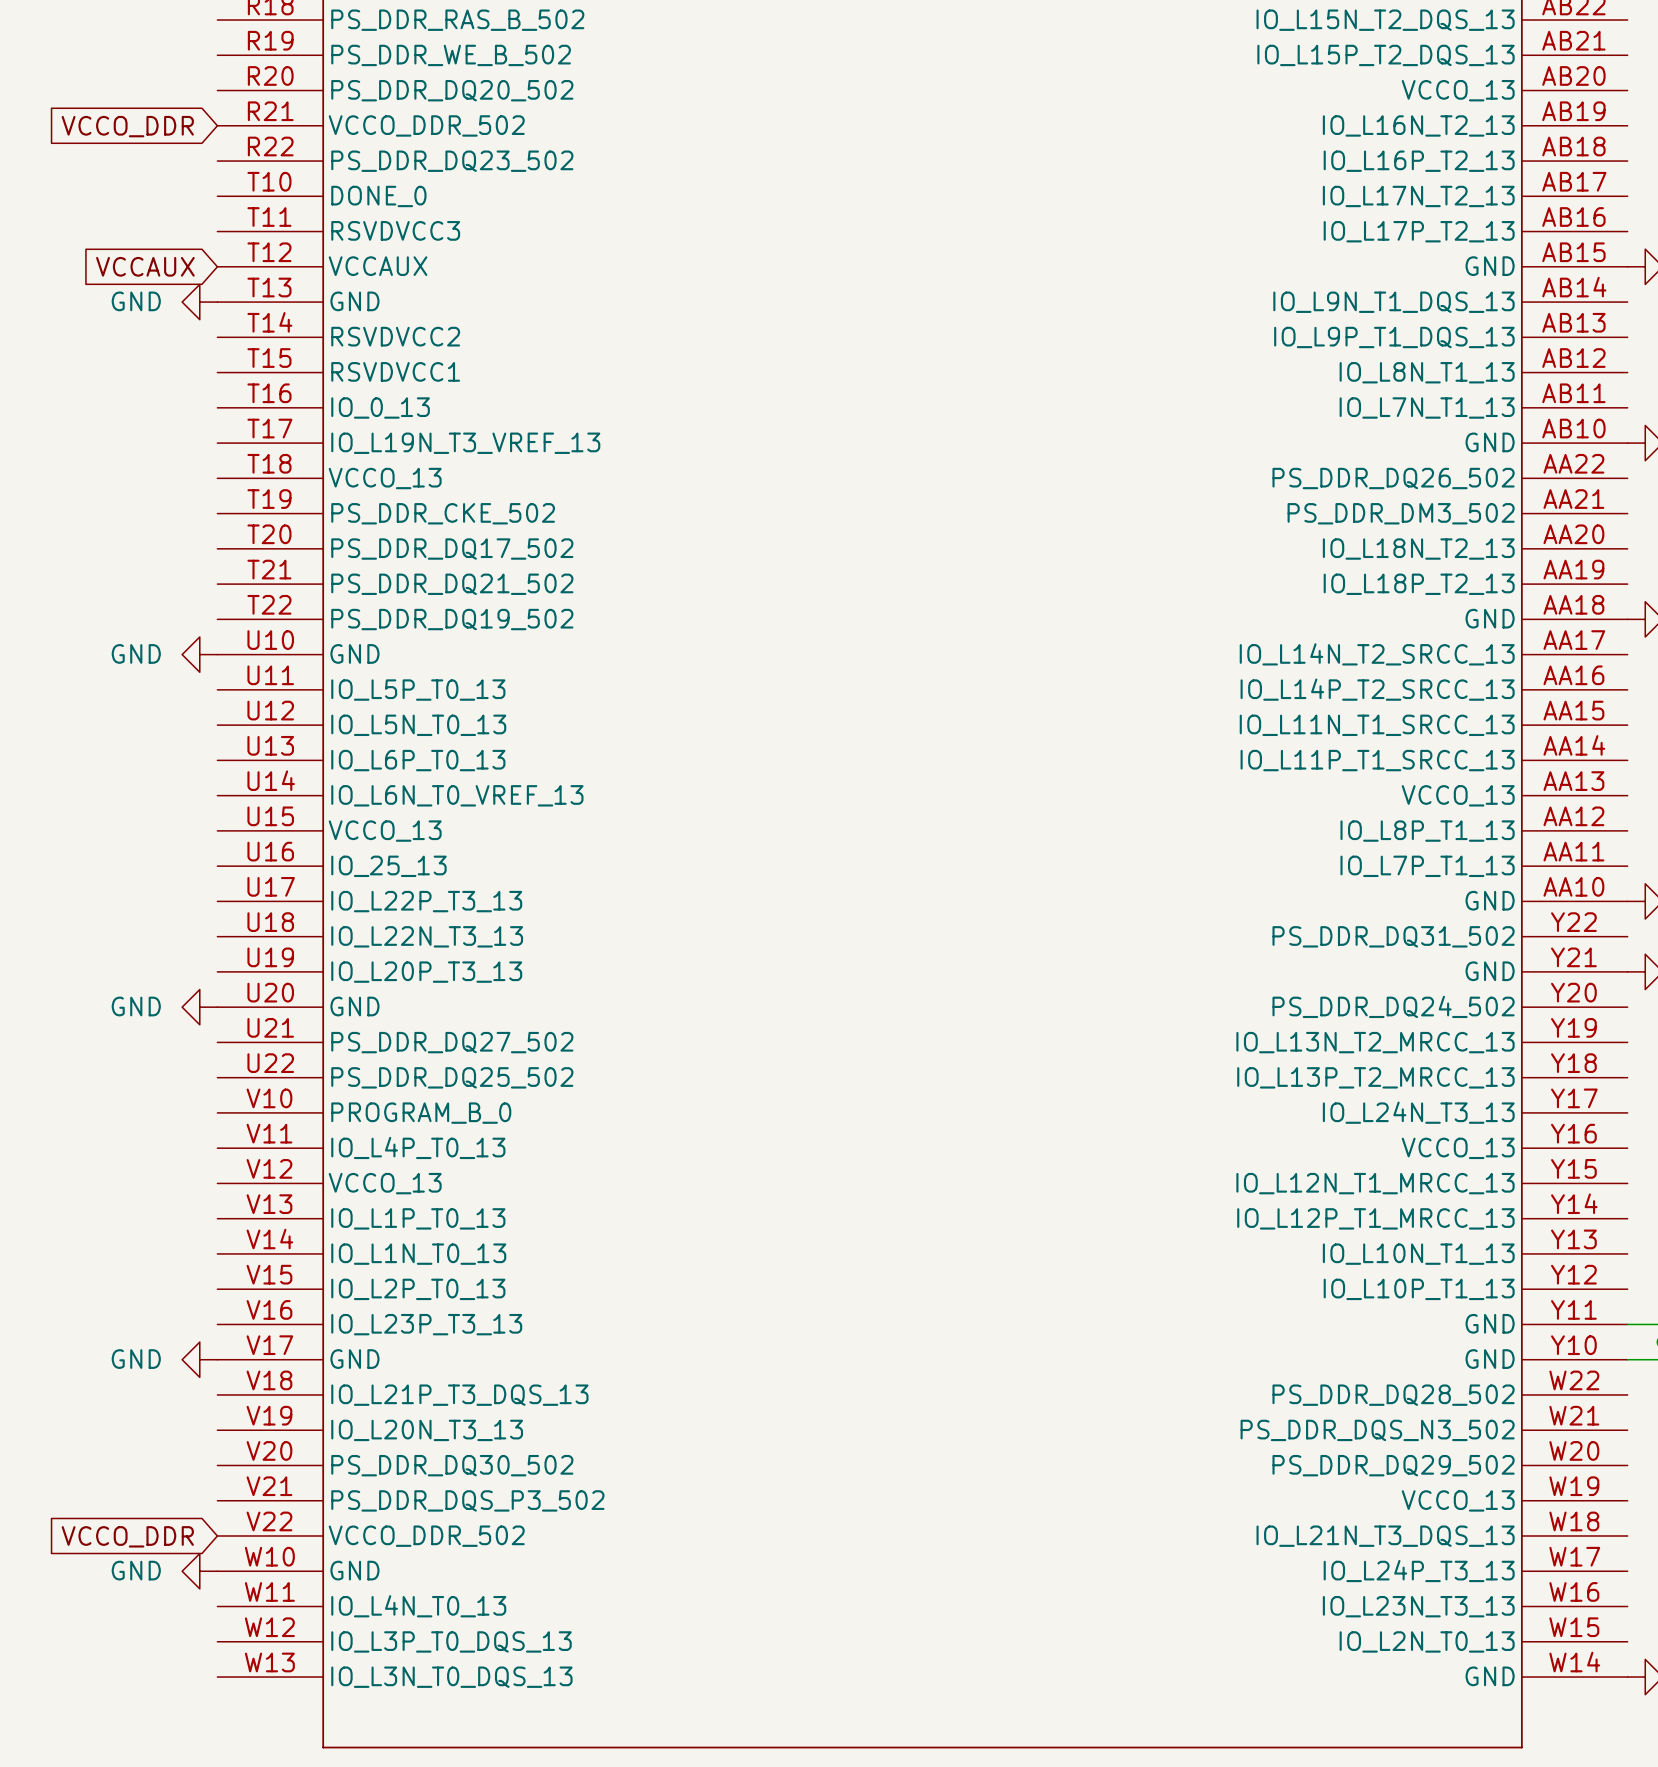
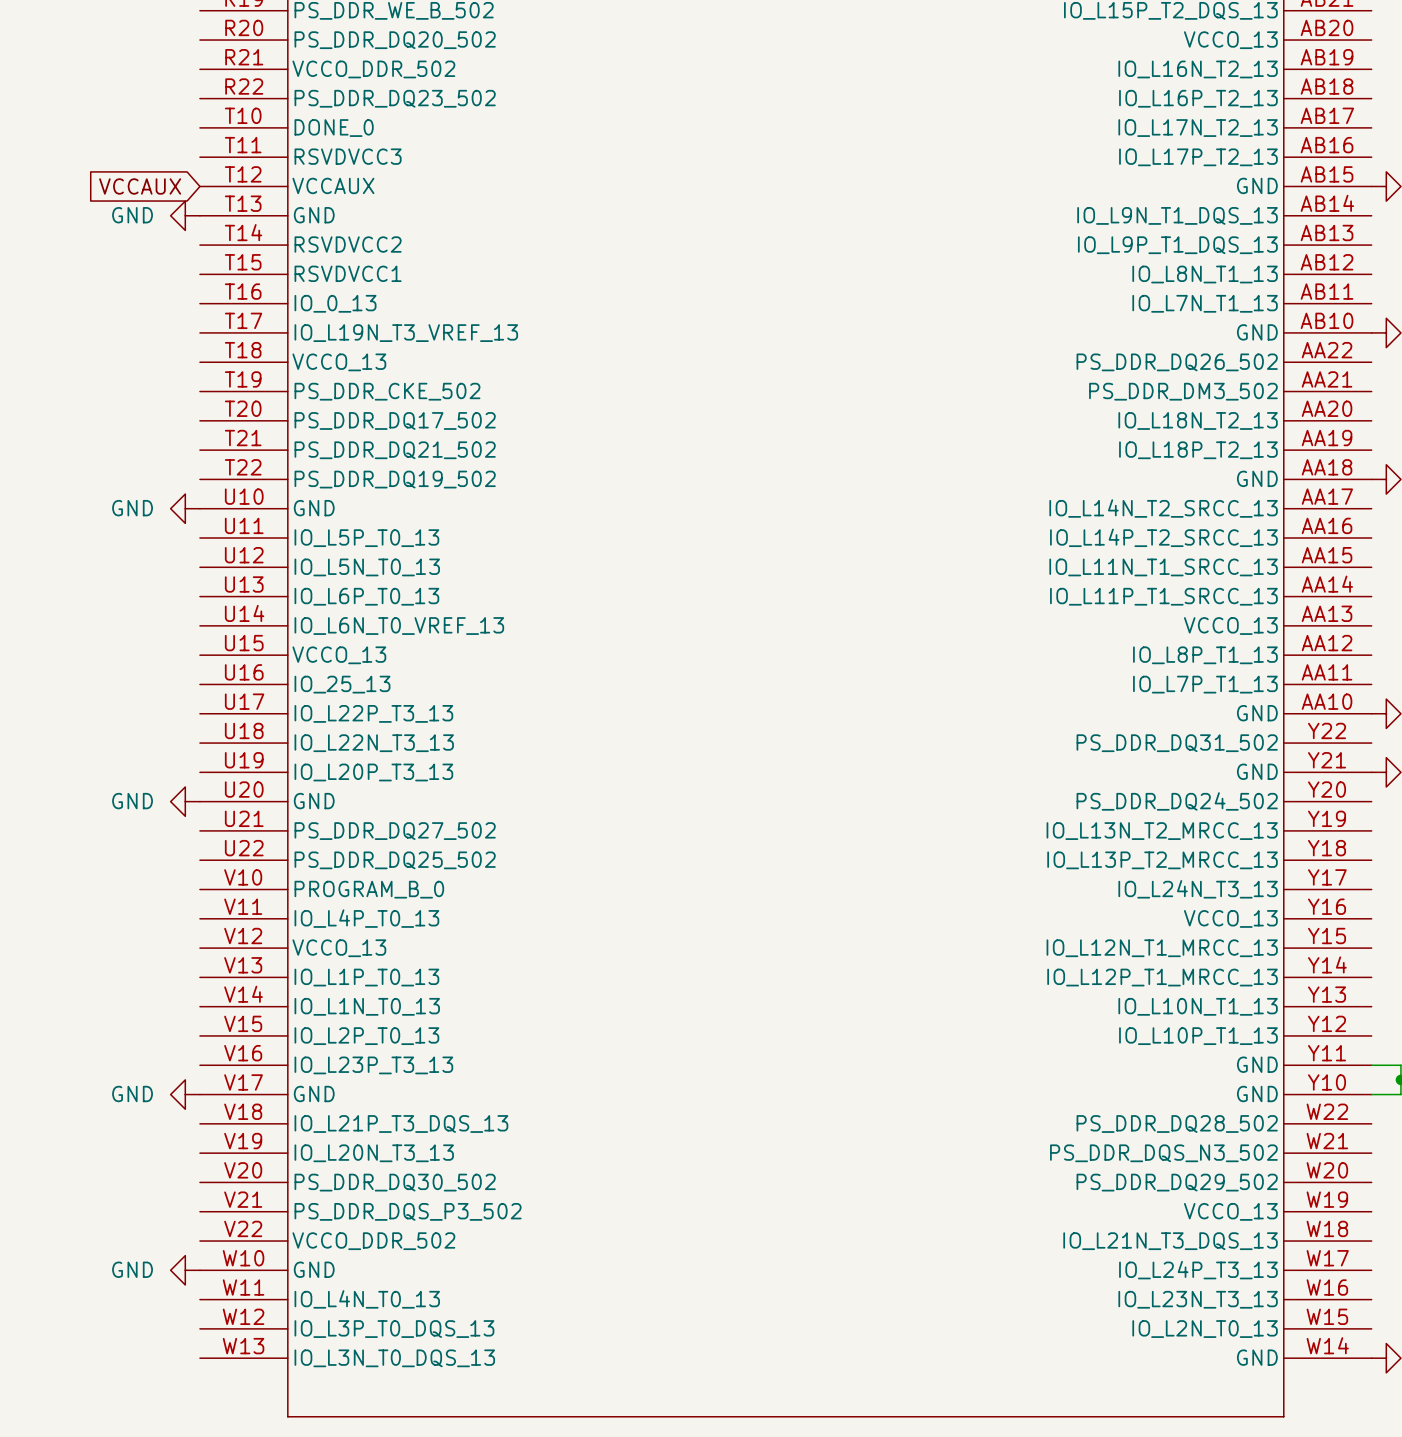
global label: VCCO_DDR (127, 126) -> none
global label: VCCO_DDR (127, 1536) -> none

